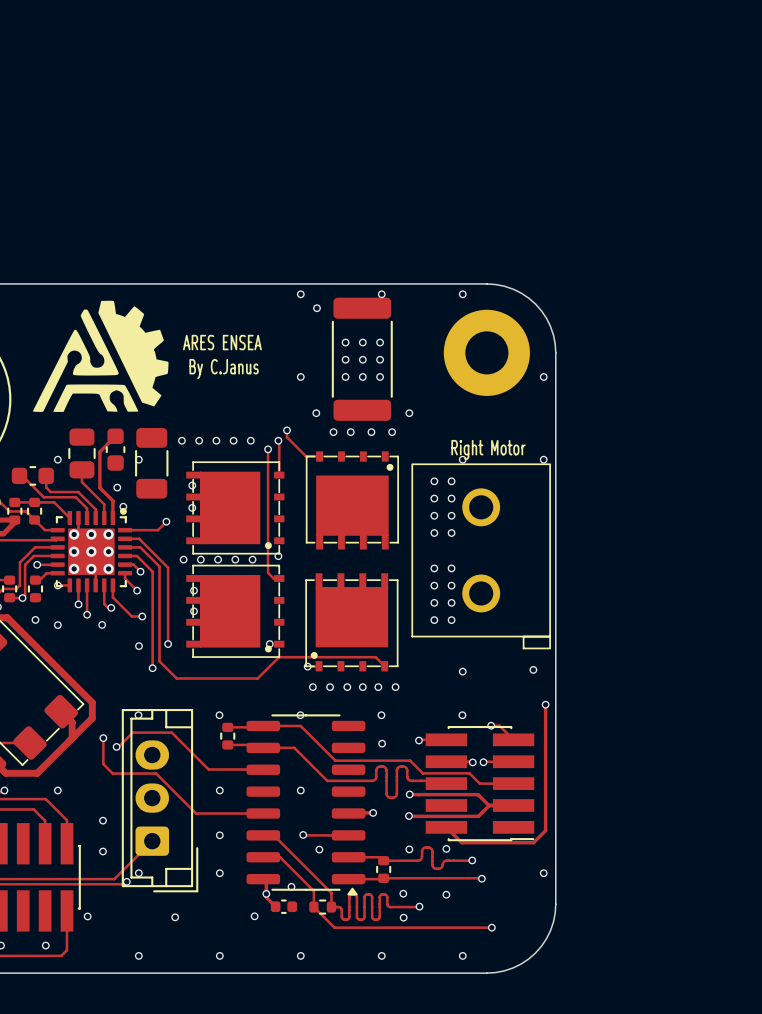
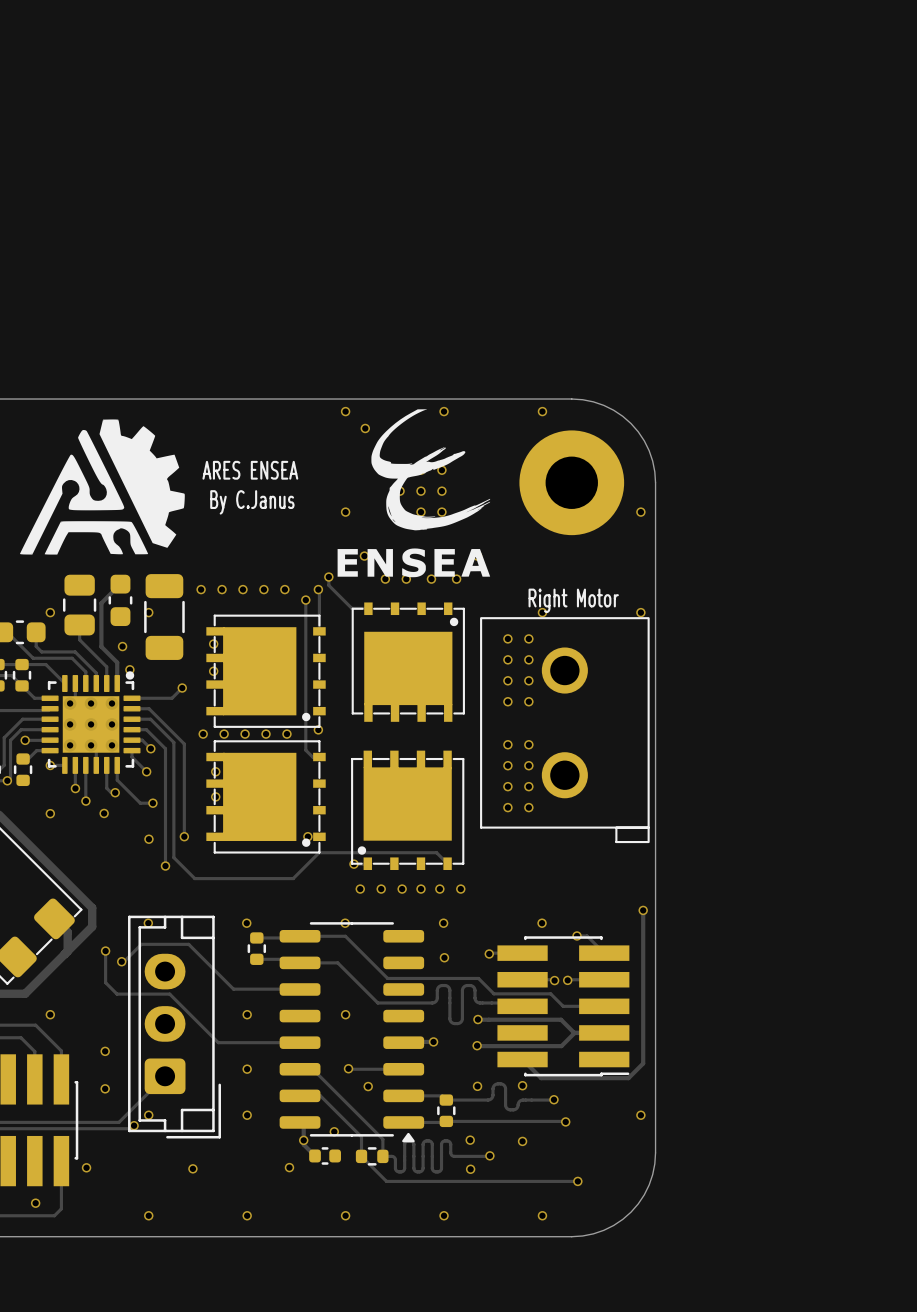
drawing: none -> [337, 409, 491, 578]
part: (362, 359) -> none
via: (35, 619) -> none
via: (533, 669) -> none
via: (462, 671) -> none

